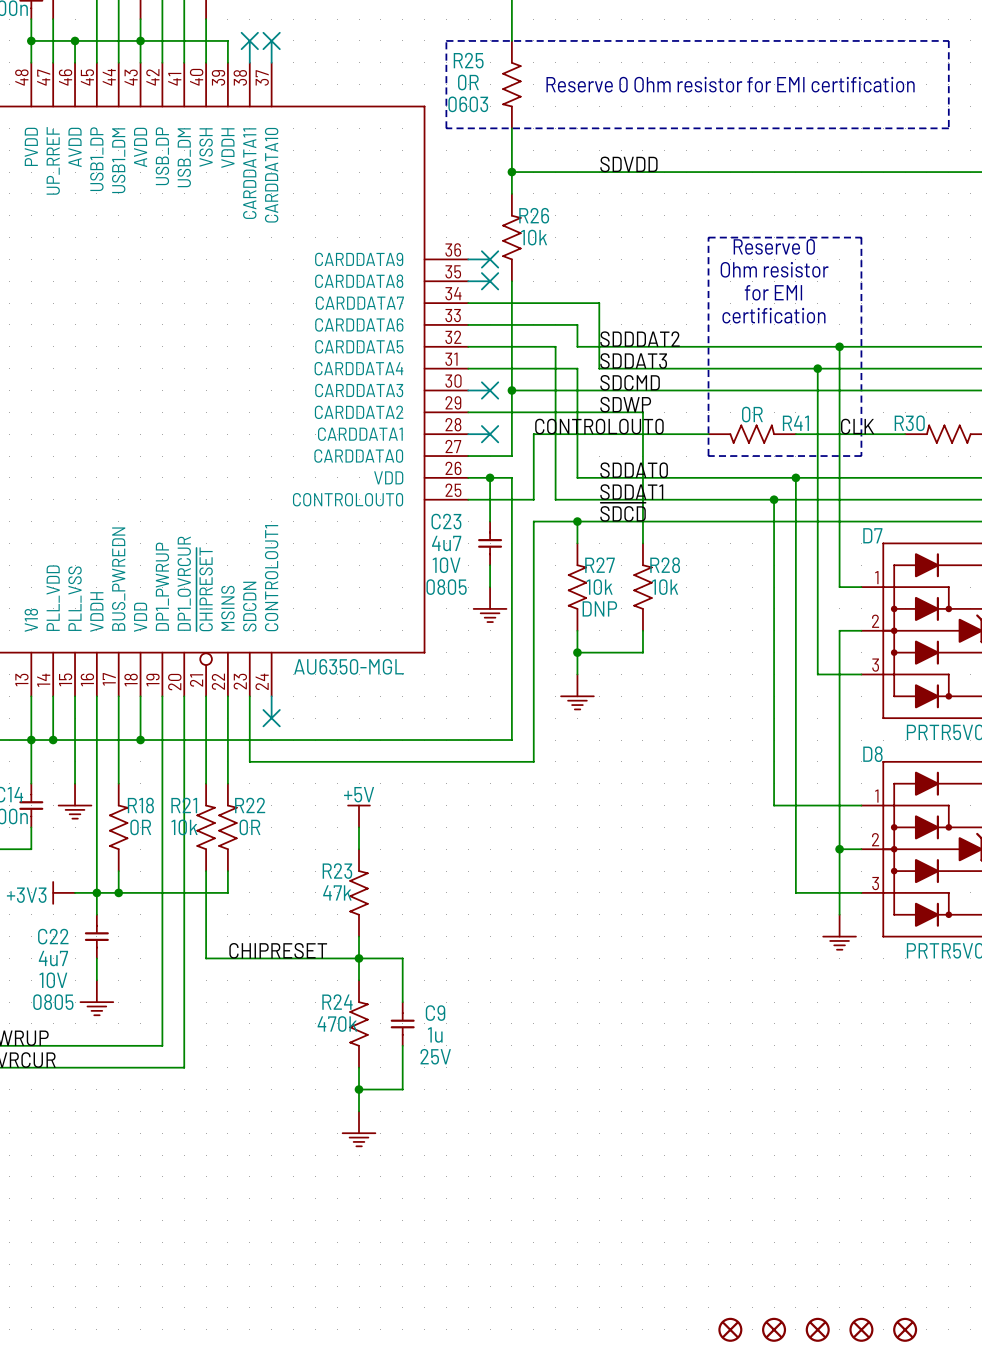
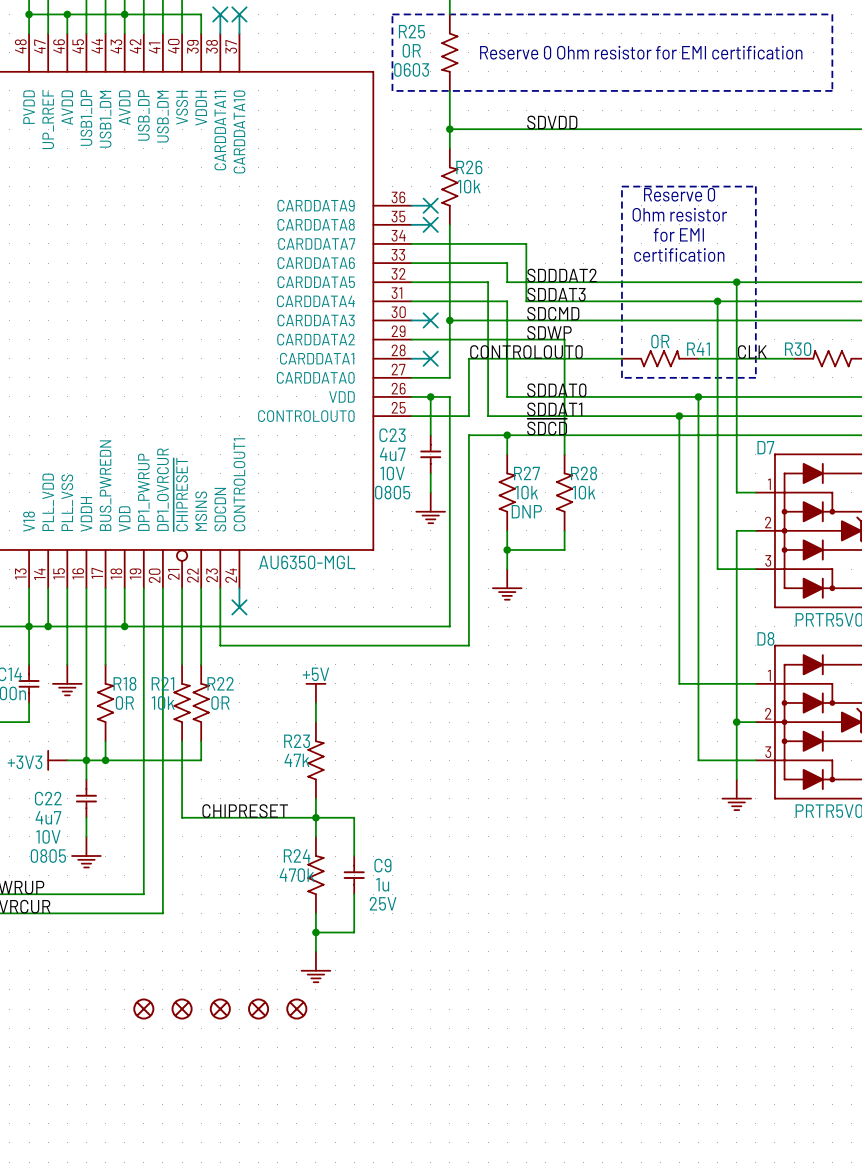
part: none -> (143, 1009)
part: none -> (182, 1009)
part: none -> (220, 1009)
part: none -> (258, 1009)
part: none -> (296, 1009)
part: (730, 1329) -> none
part: (774, 1329) -> none
part: (817, 1329) -> none
part: (861, 1329) -> none
part: (905, 1329) -> none

